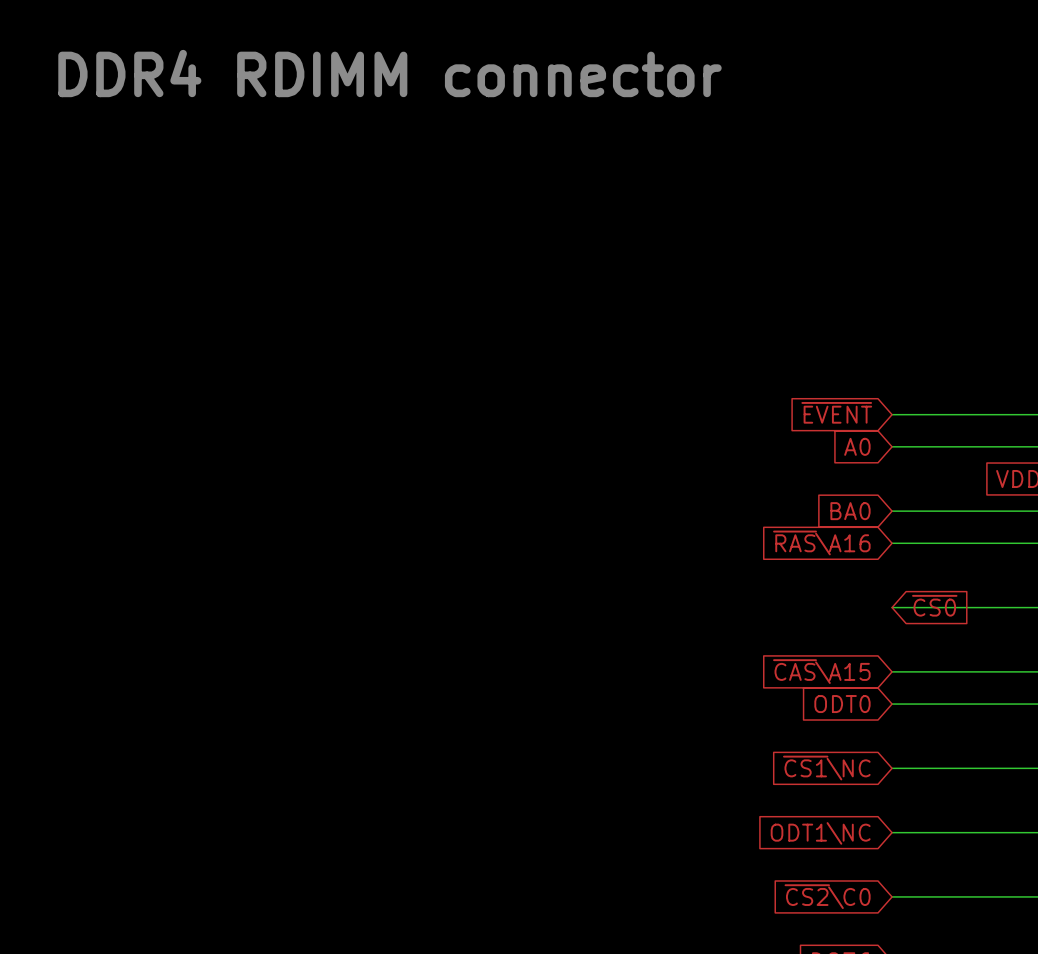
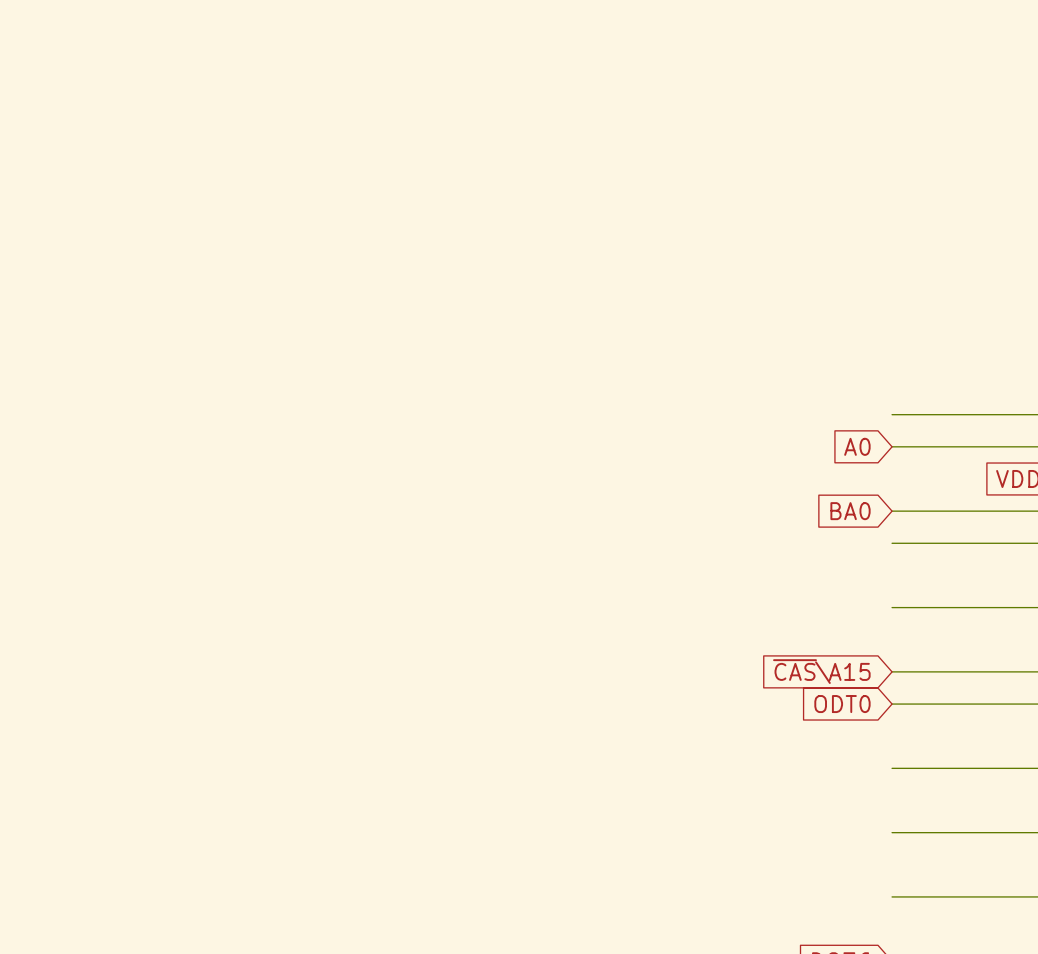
text: DDR4 RDIMM connector (390, 73) -> none
global label: ~{EVENT} (836, 412) -> none
global label: ~{RAS}\A16 (821, 542) -> none
global label: ~{CS0} (934, 605) -> none
global label: ~{CS1}\NC (826, 768) -> none
global label: ODT1\NC (820, 833) -> none
global label: ~{CS2}\C0 (827, 896) -> none

